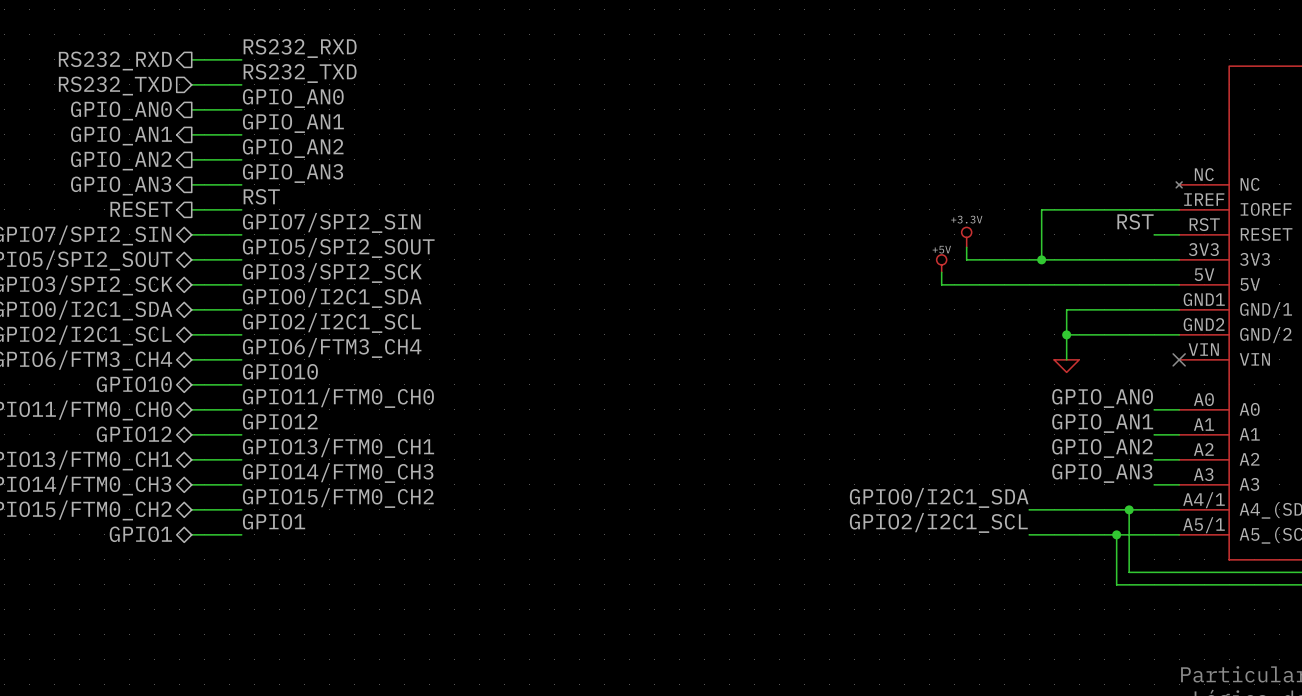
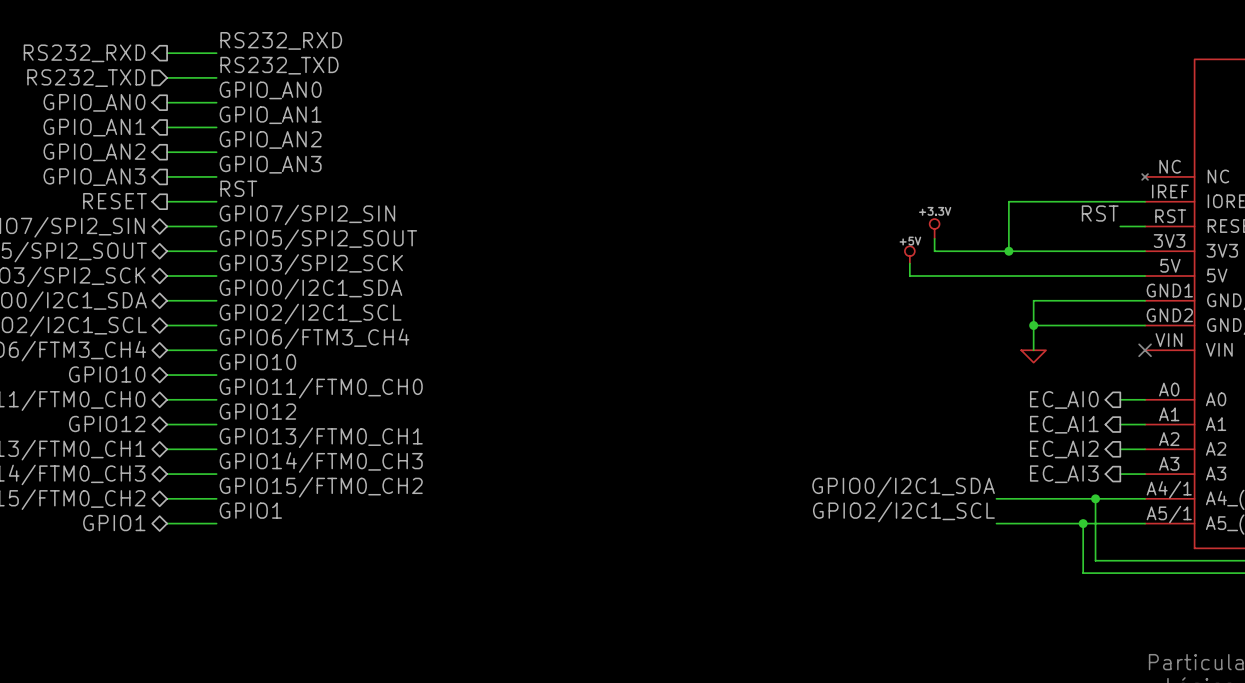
label: GPIO_AN0 (1102, 398) -> none
hierarchical label: none -> EC_AI0 (1064, 399)
label: GPIO_AN1 (1102, 423) -> none
hierarchical label: none -> EC_AI1 (1064, 424)
label: GPIO_AN2 (1102, 448) -> none
hierarchical label: none -> EC_AI2 (1064, 449)
label: GPIO_AN3 (1102, 473) -> none
hierarchical label: none -> EC_AI3 (1064, 474)

